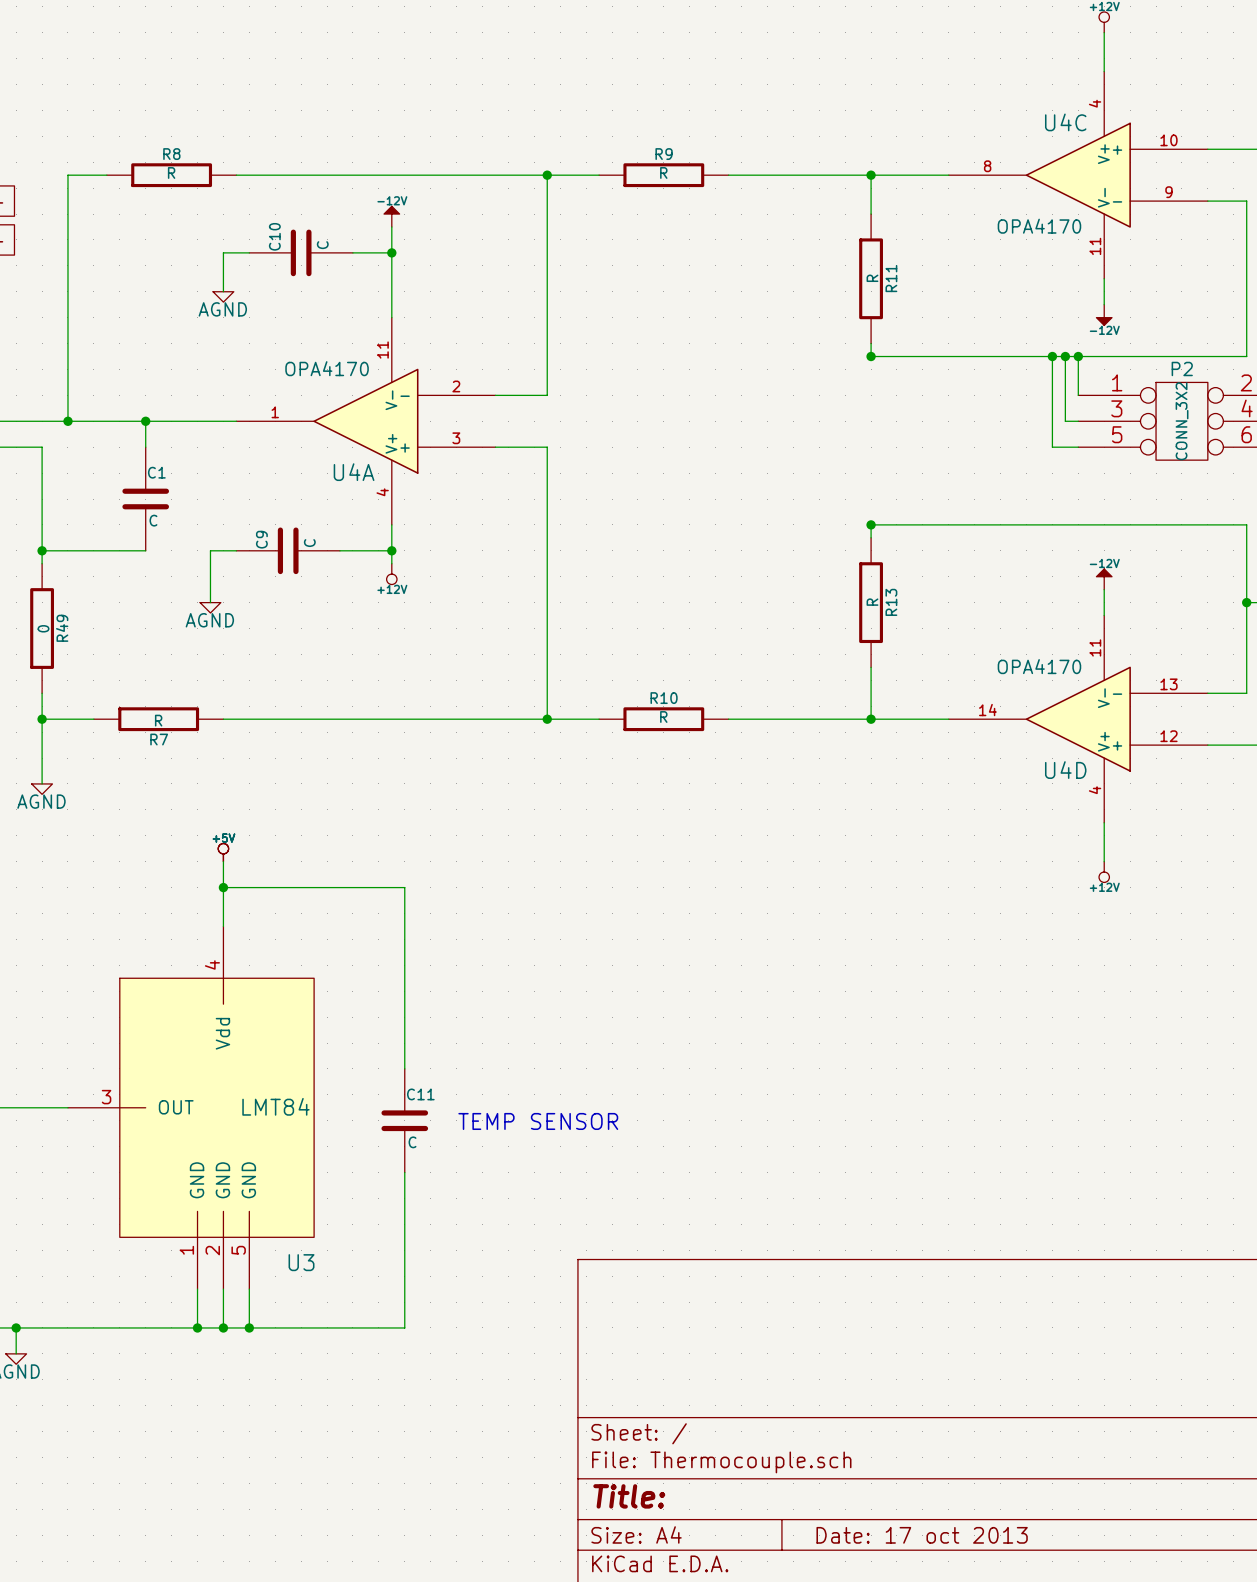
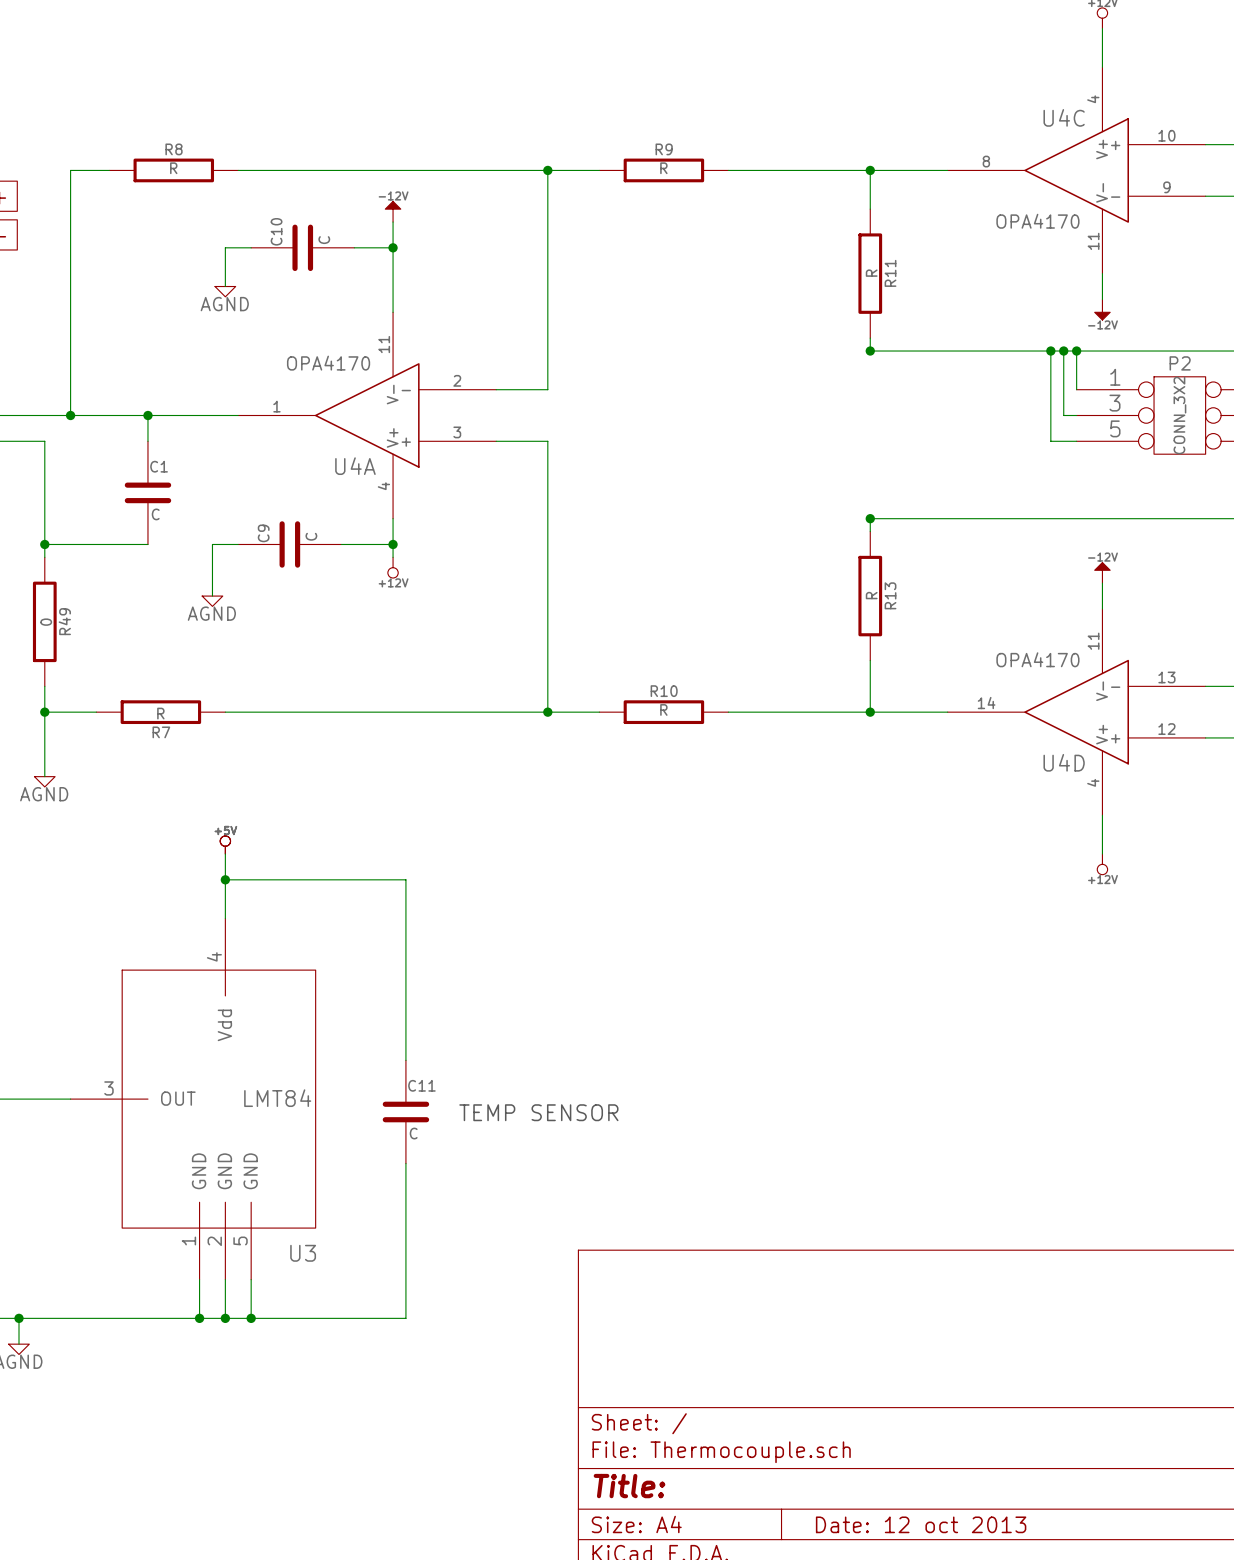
title block: Date: 17 oct 2013 (922, 1535) -> Date: 12 oct 2013 (921, 1524)

